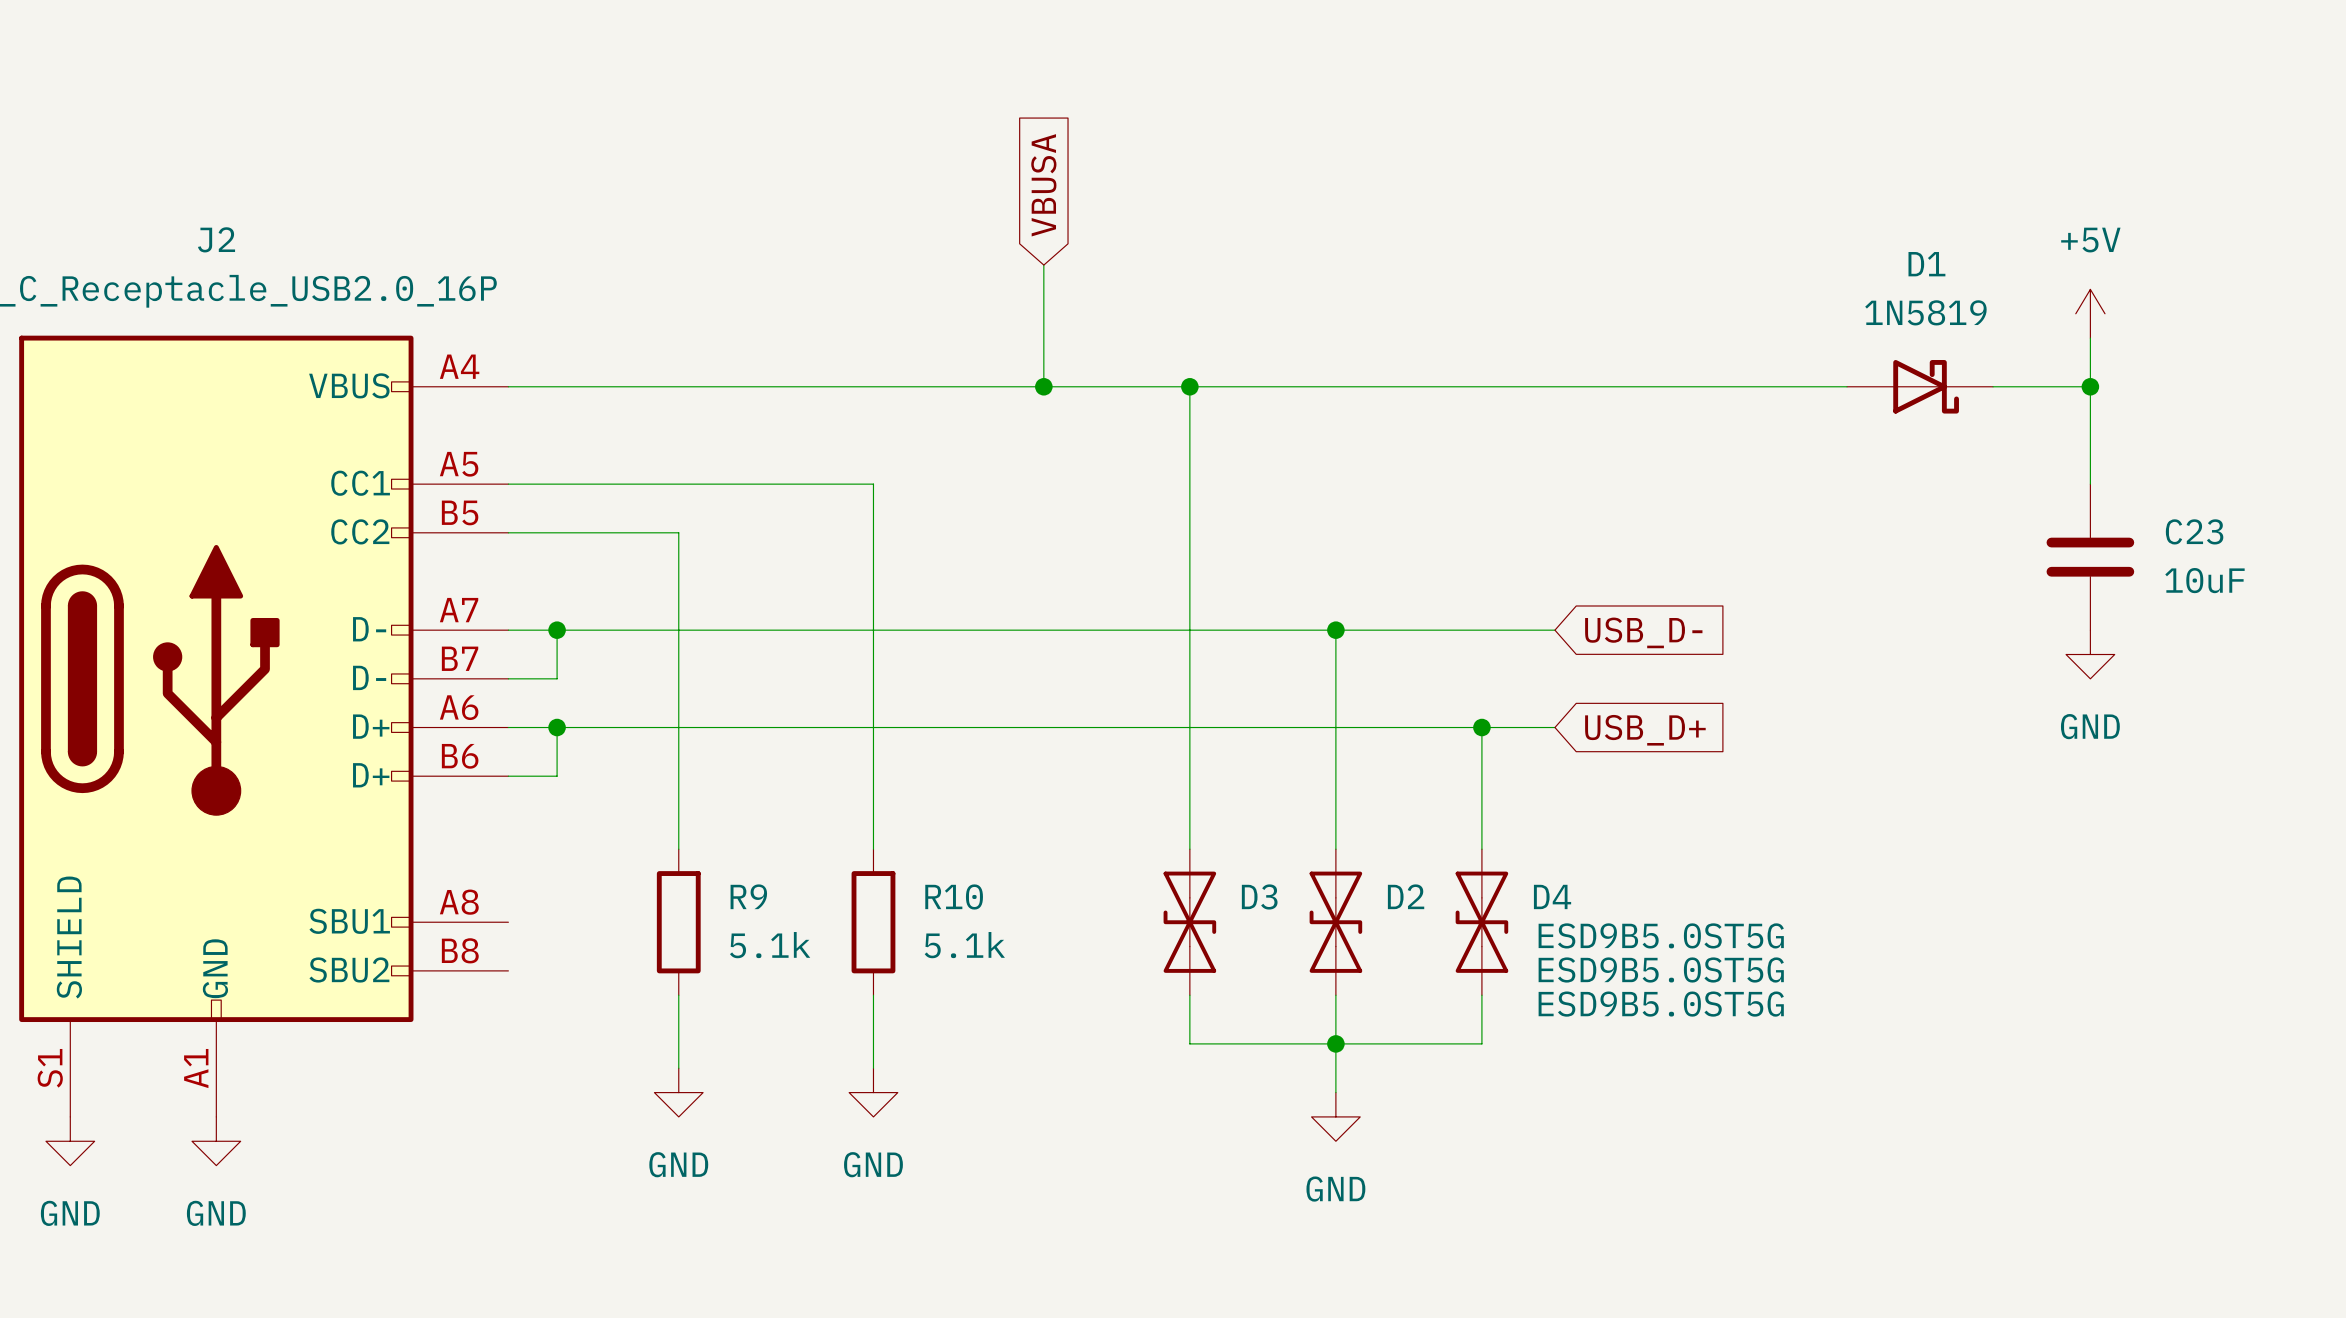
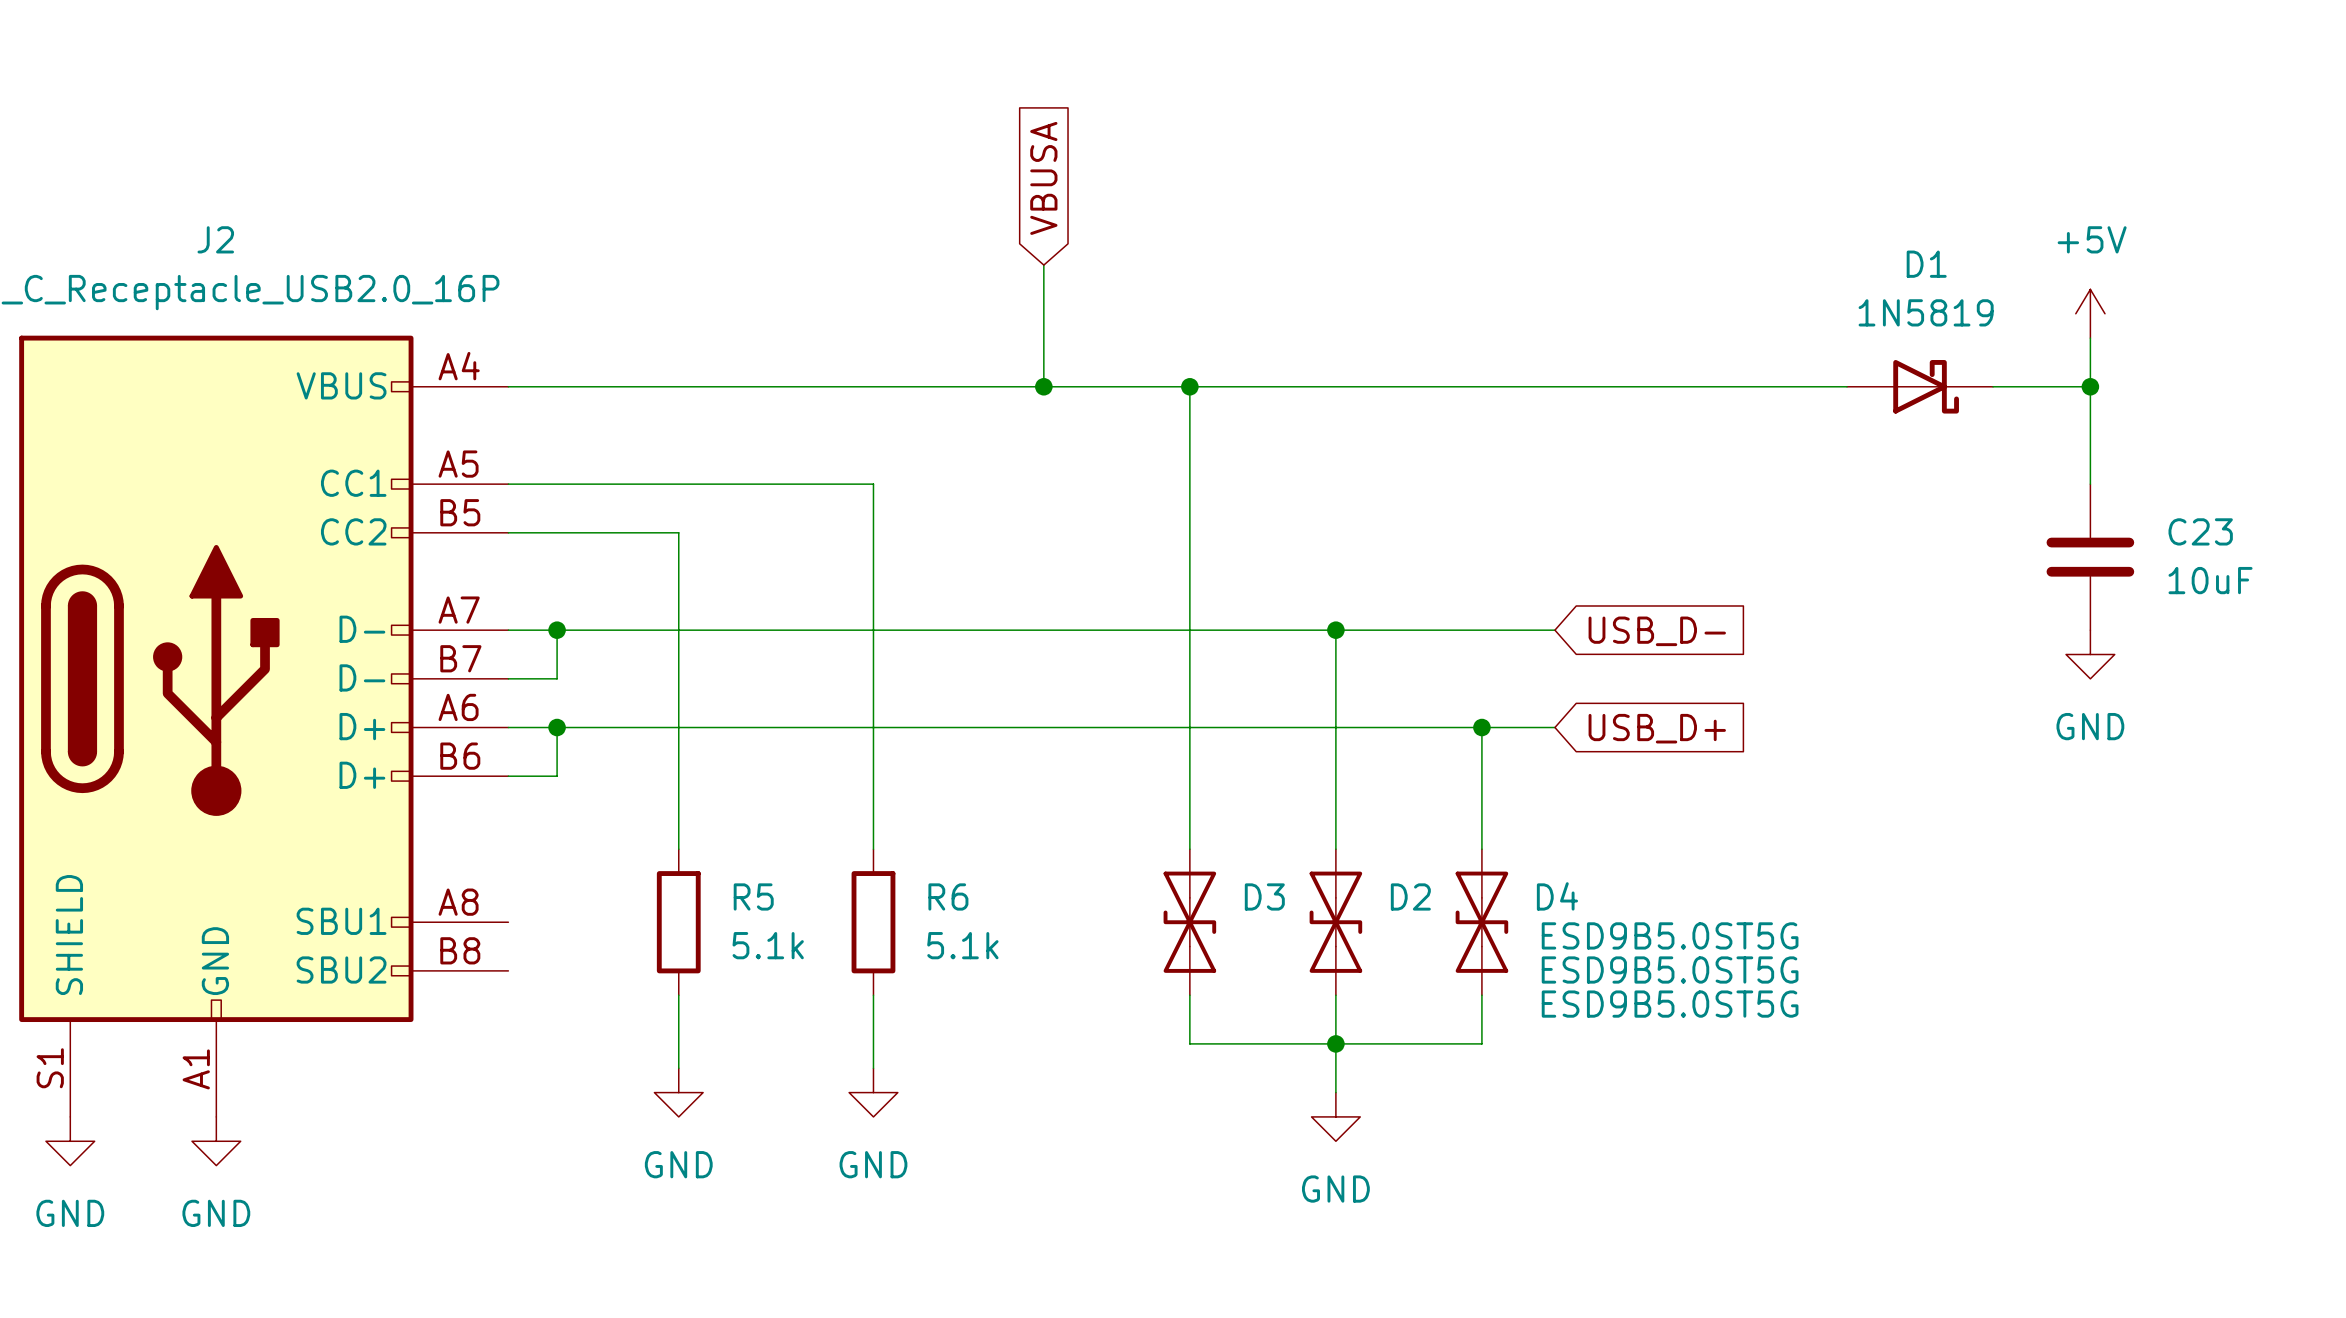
R9 name: R9 (748, 896) -> R5 (753, 896)
R10 name: R10 (954, 896) -> R6 (948, 896)

